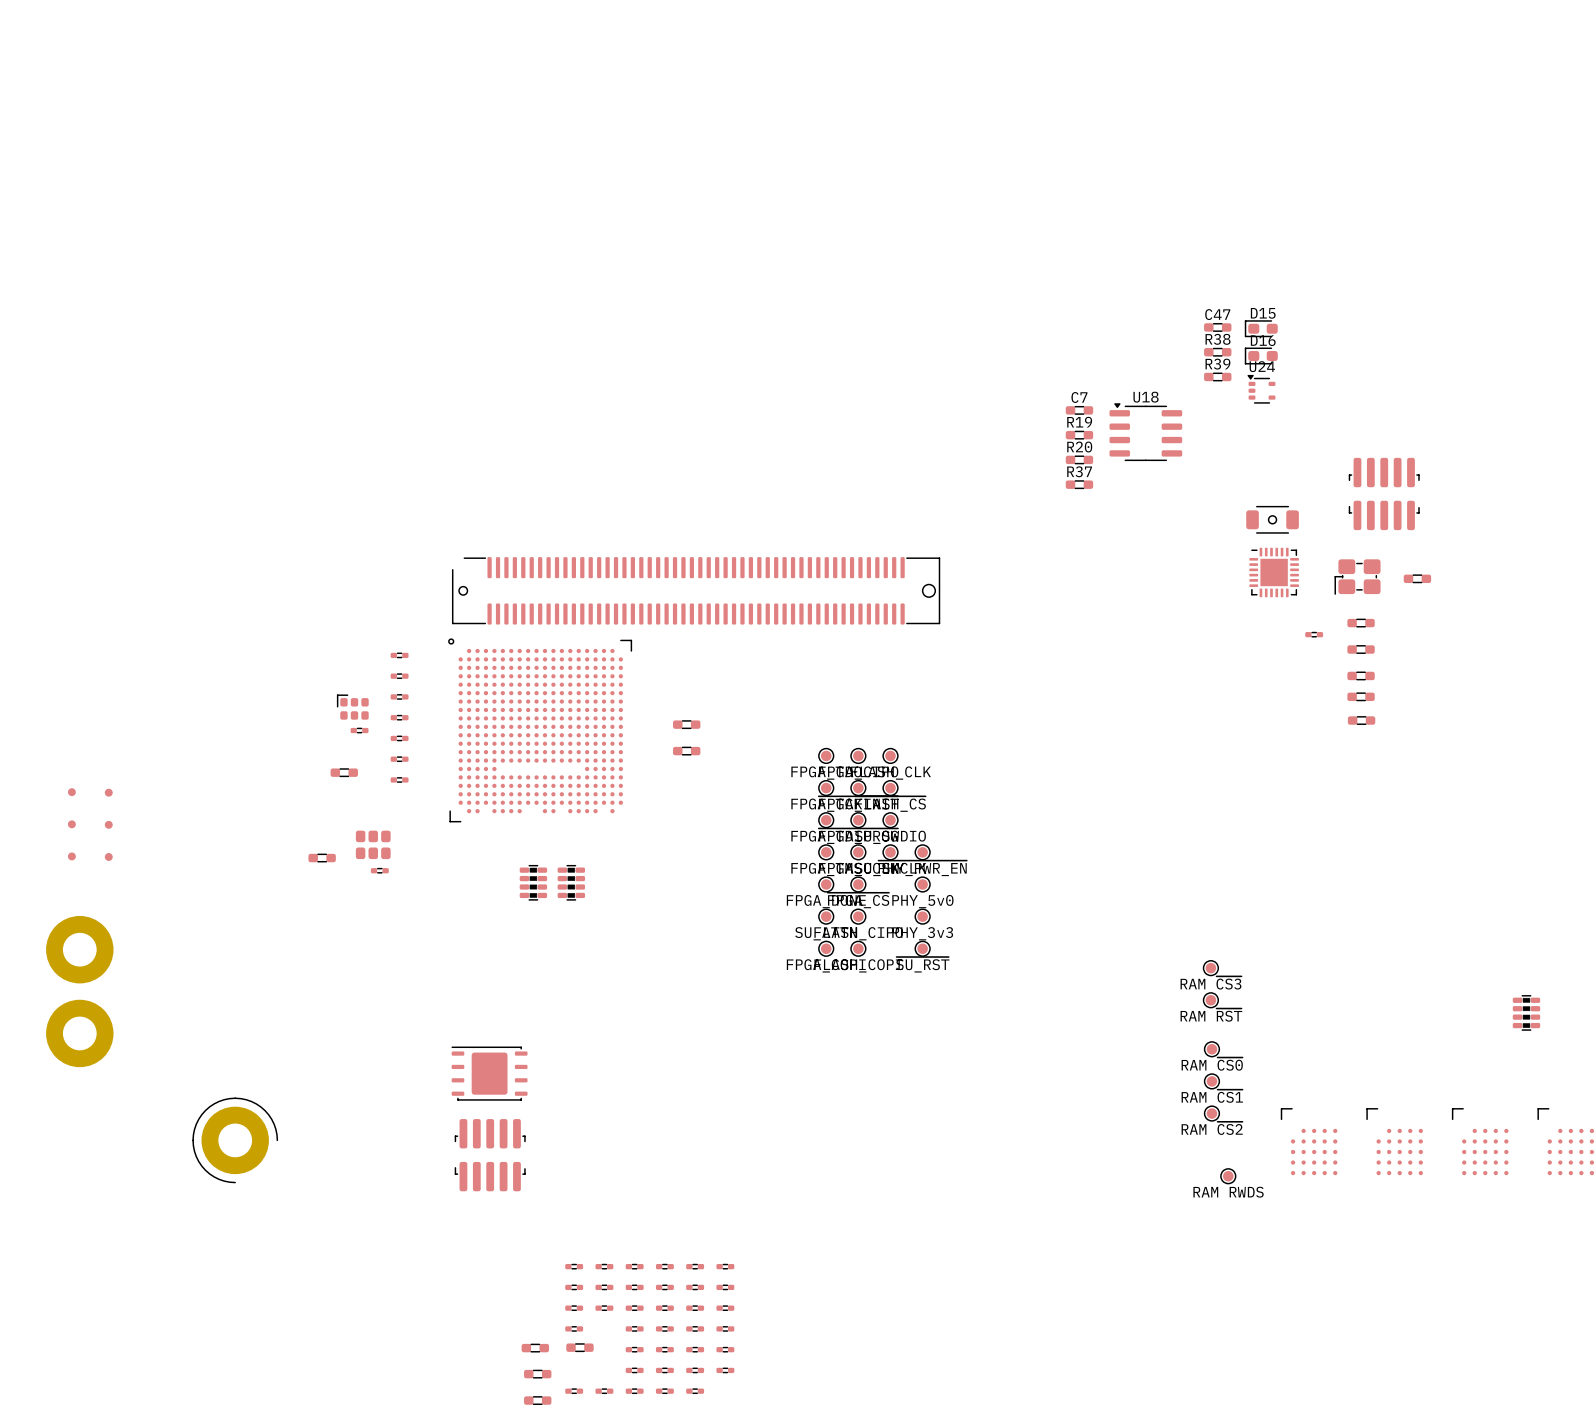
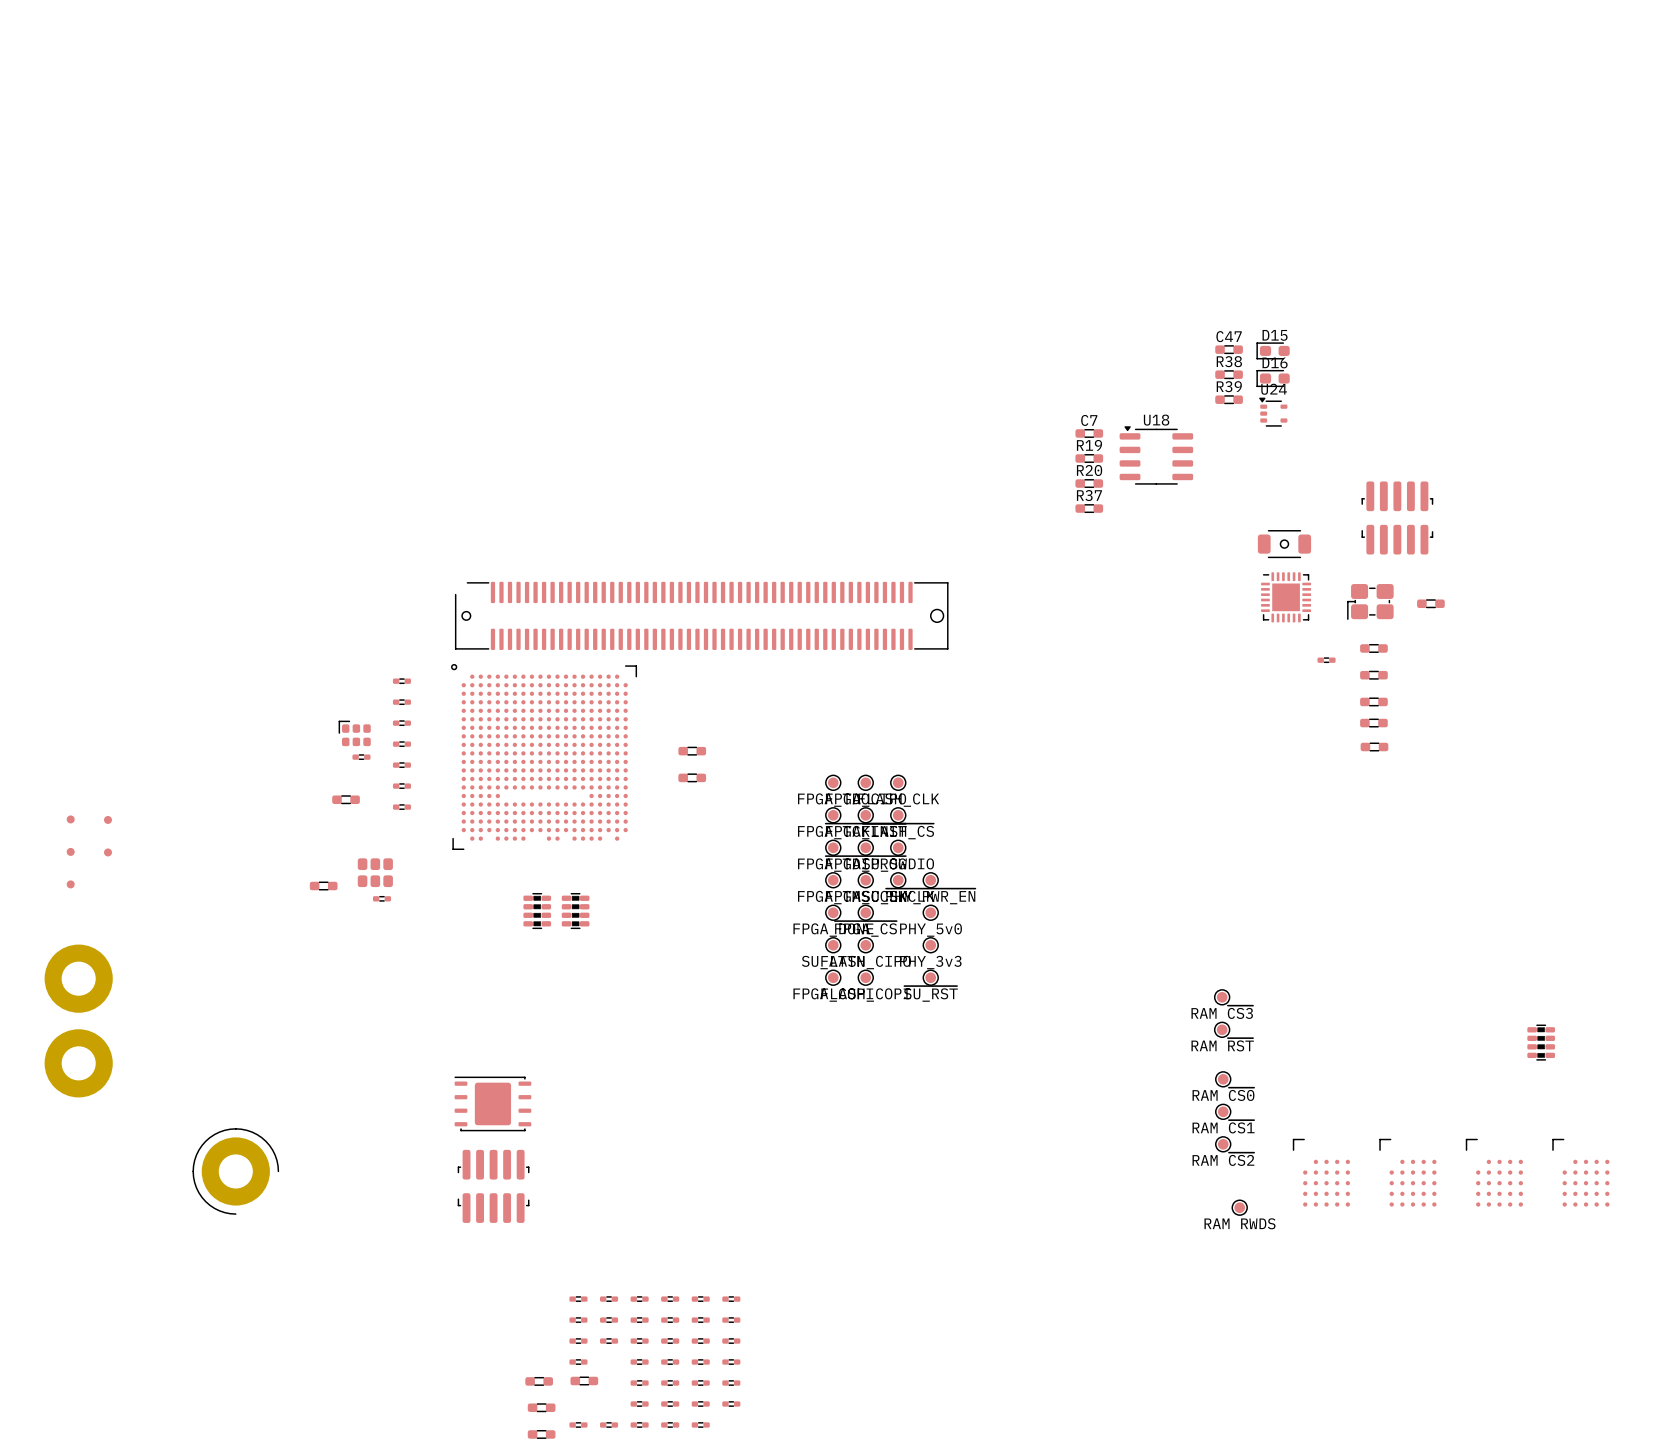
part: (108, 856) -> none

